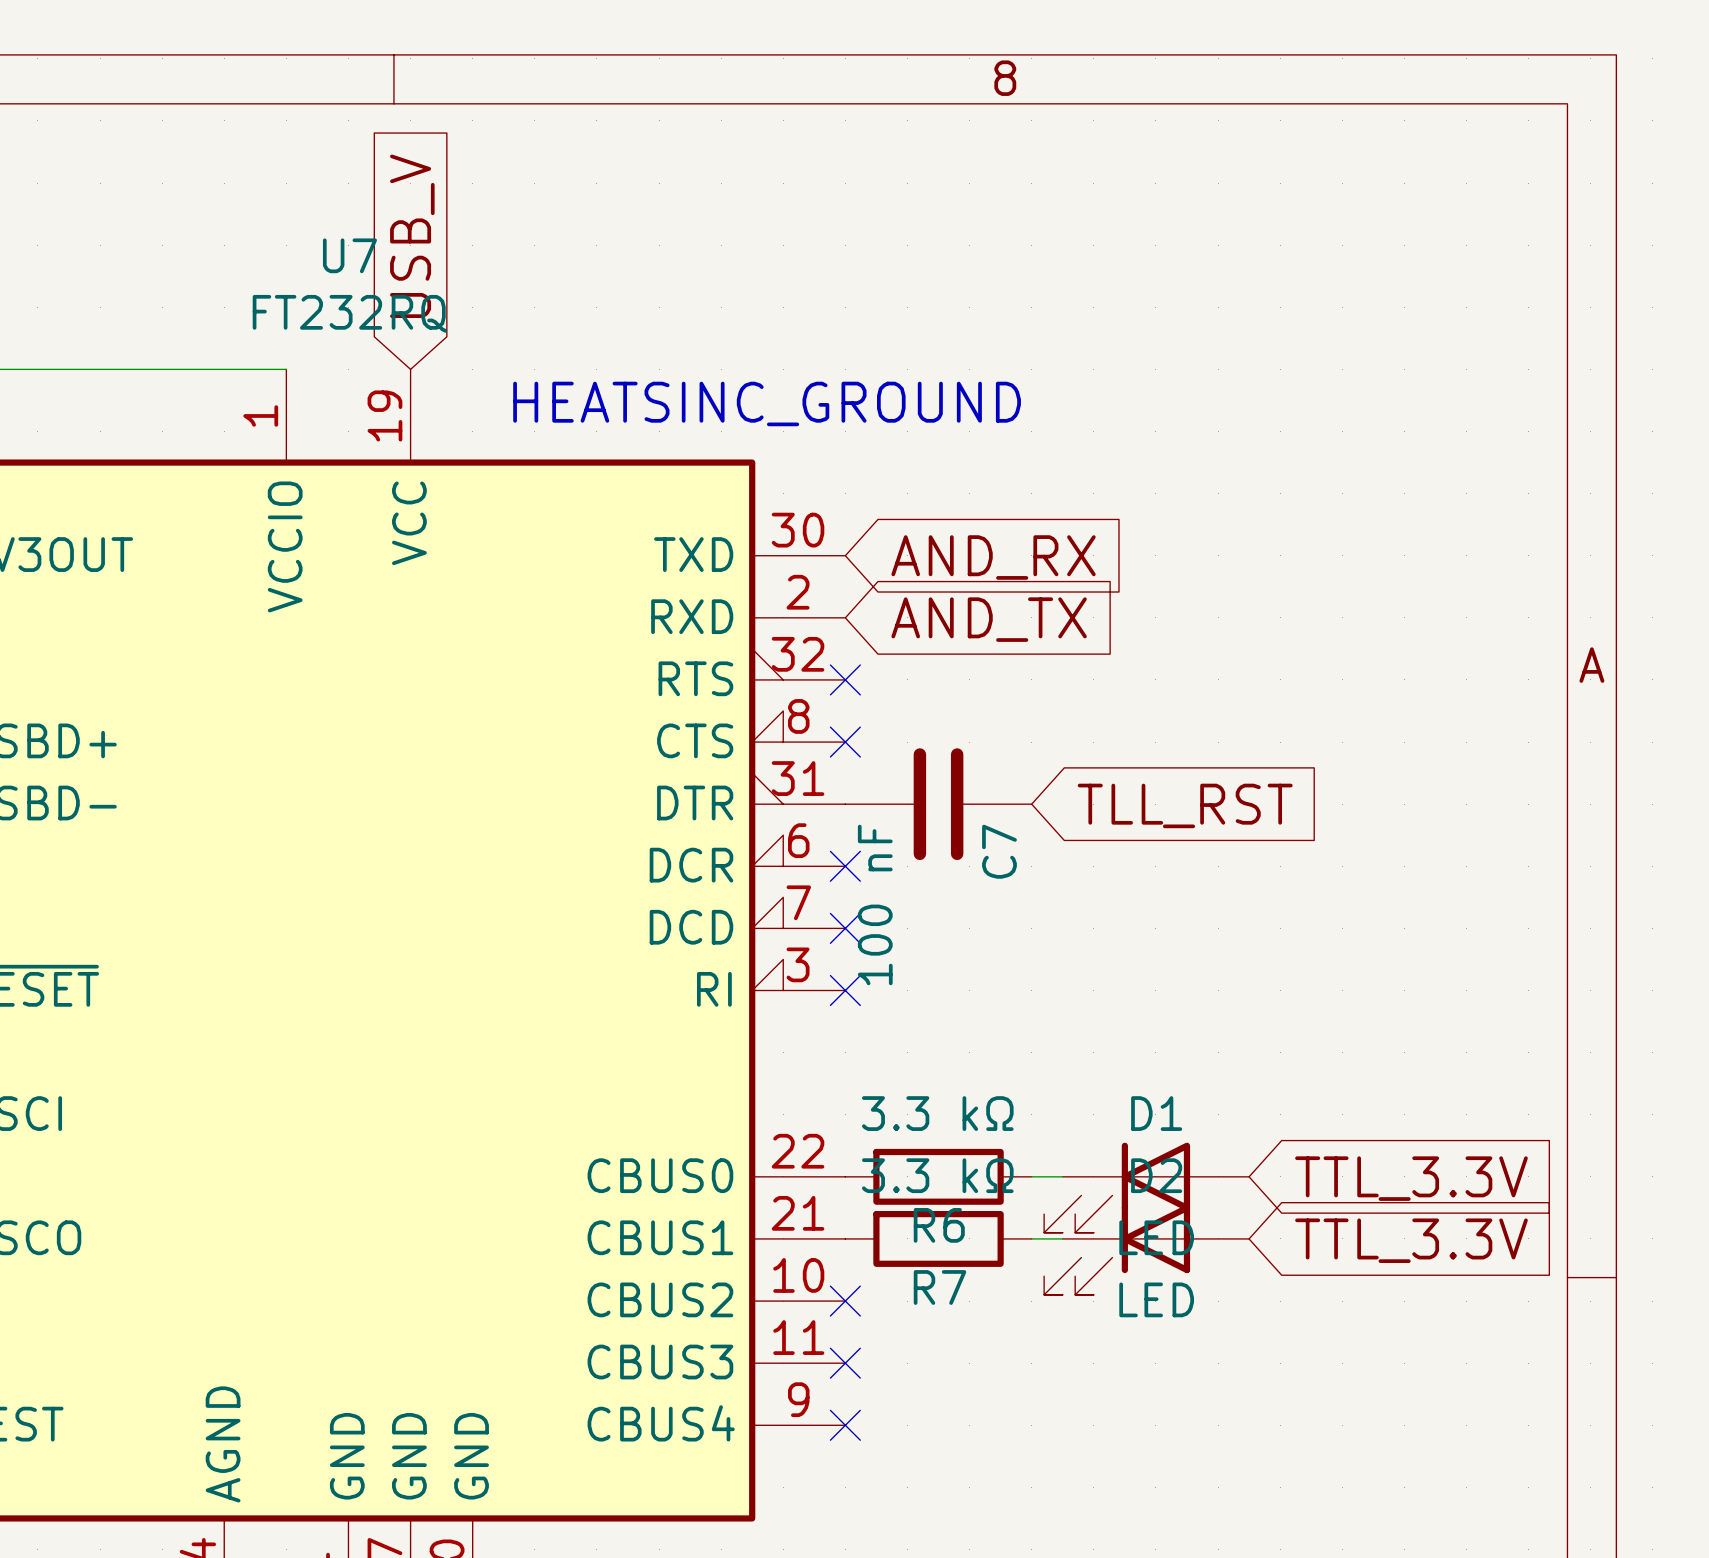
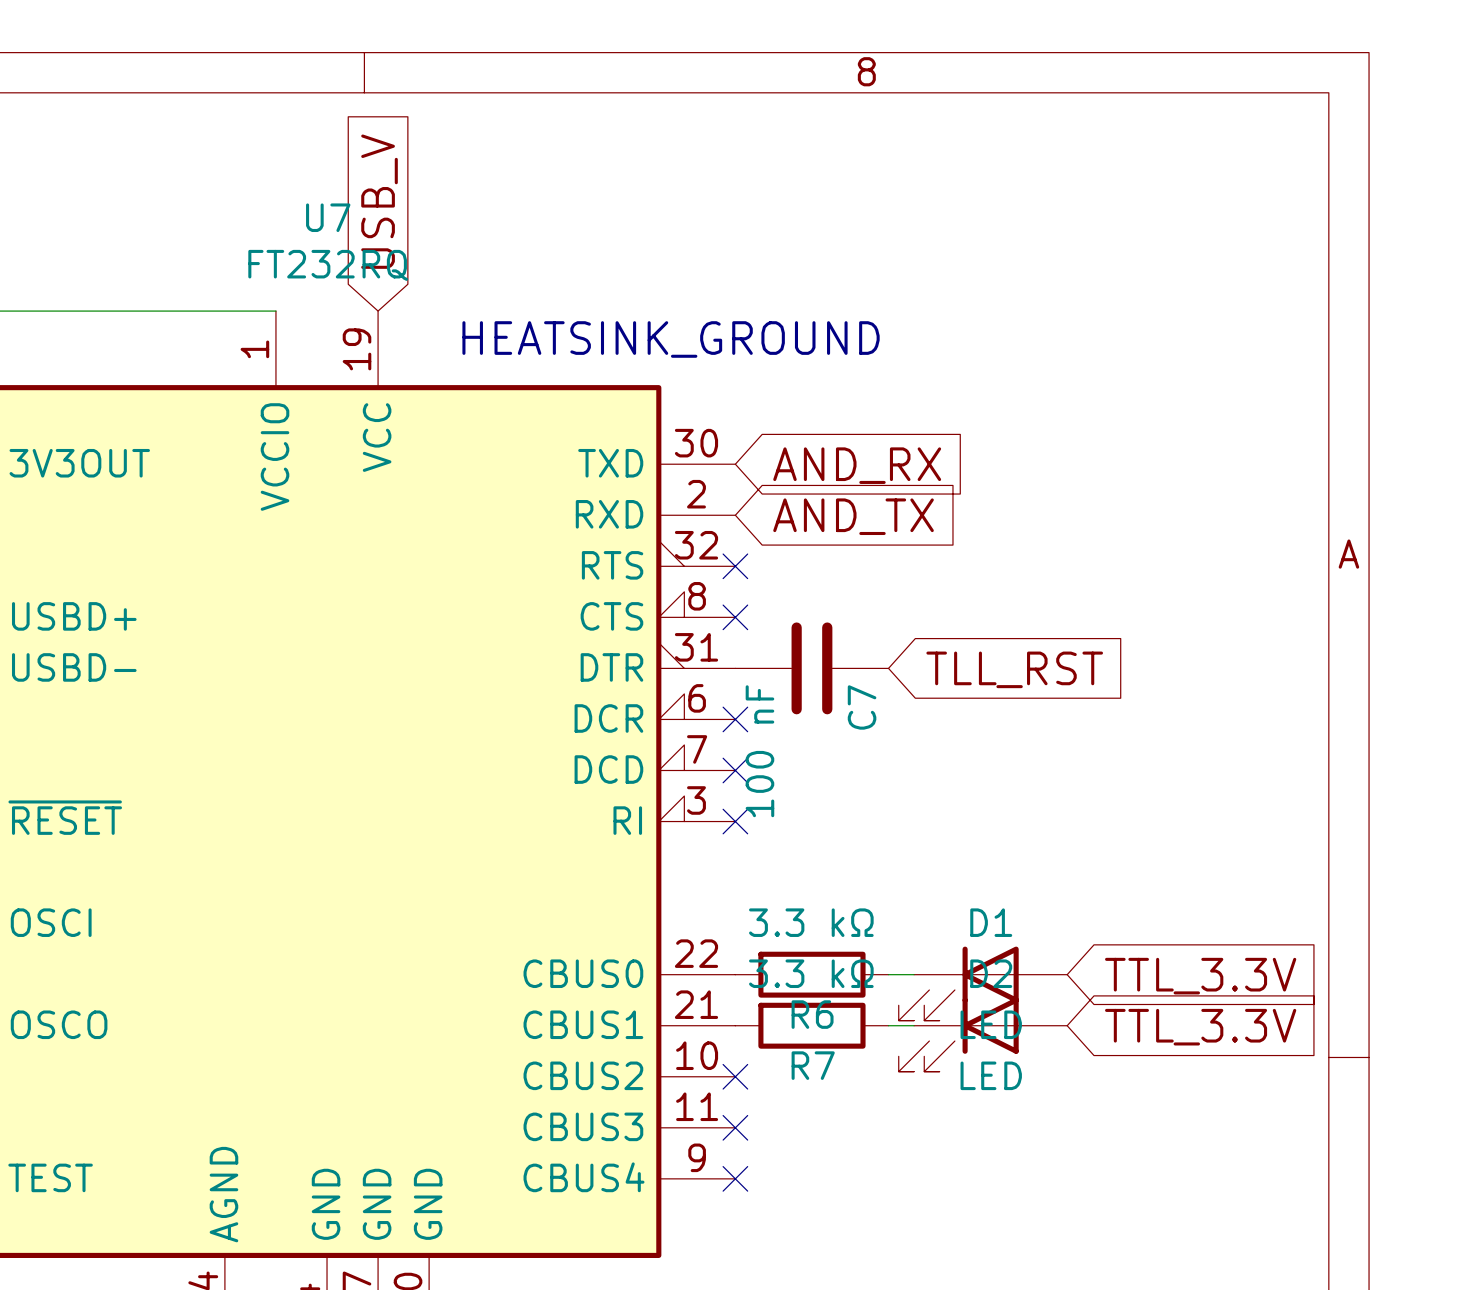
text: HEATSINC_GROUND (767, 403) -> HEATSINK_GROUND (671, 339)

